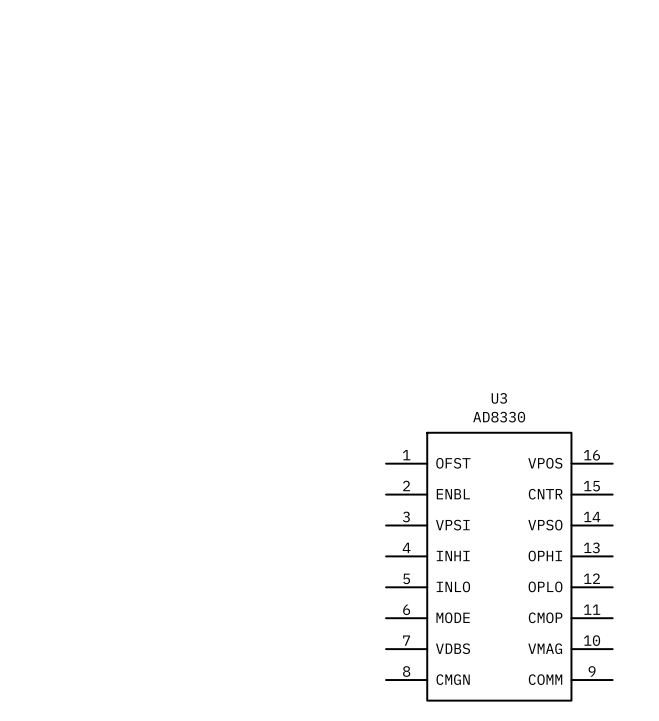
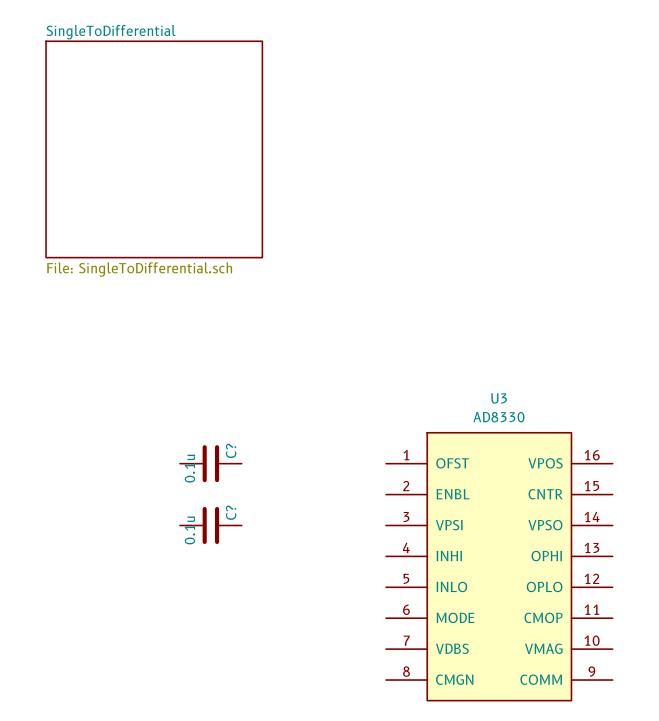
sheet SingleToDifferential: none -> File: SingleToDifferential.sch (154, 149)
C?: none -> 0.1u (210, 463)
C?: none -> 0.1u (210, 525)

